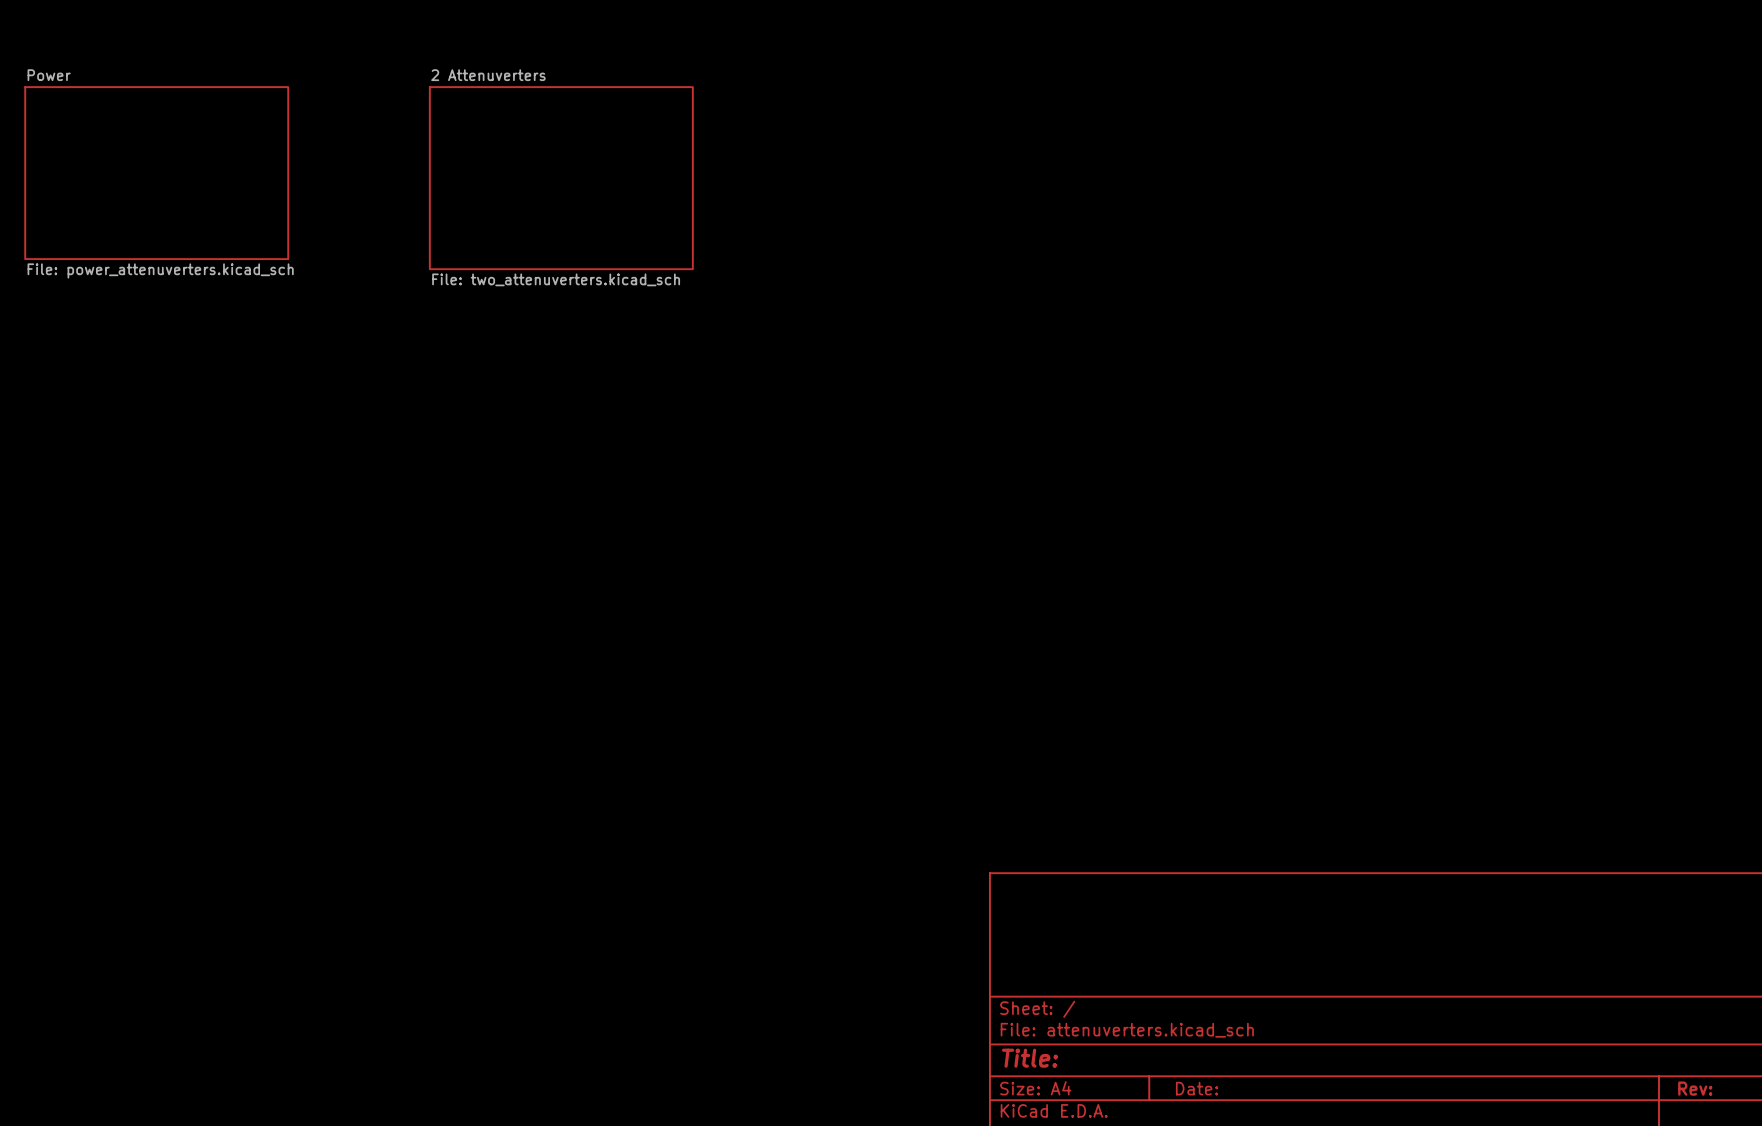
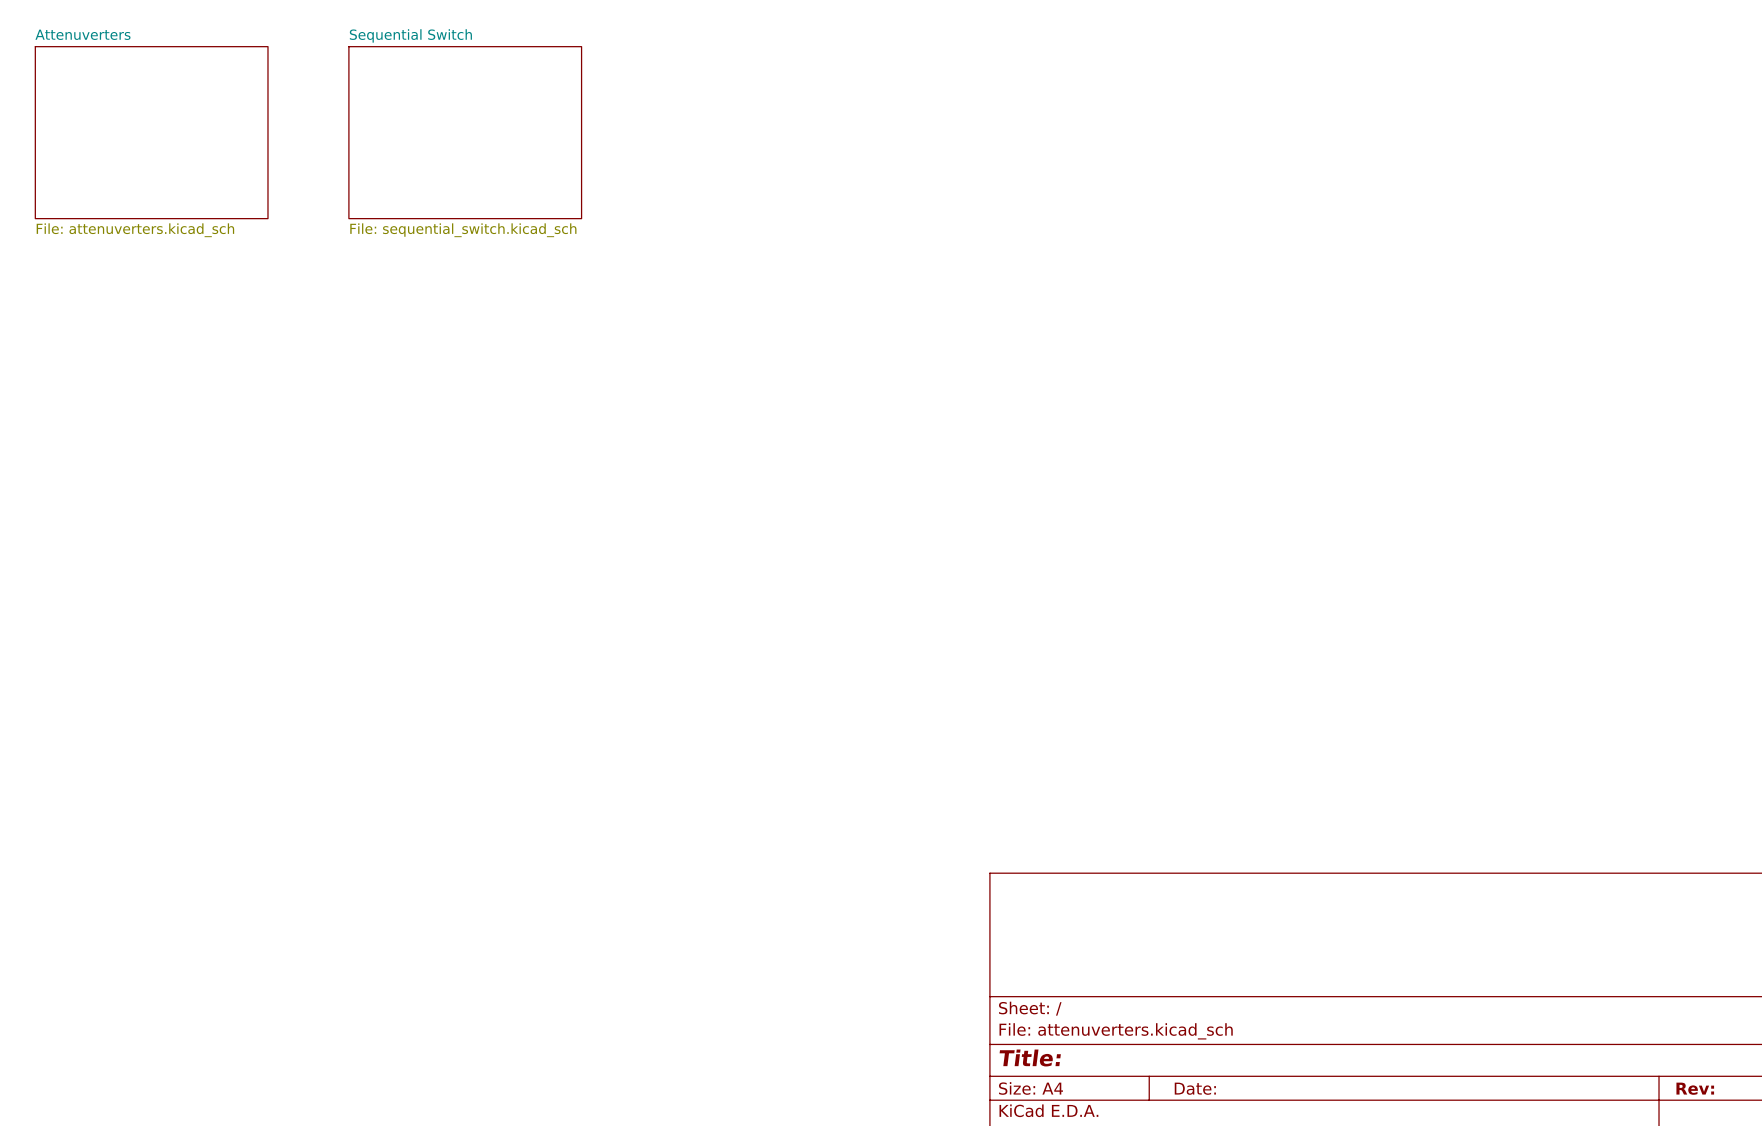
sheet Attenuverters: none -> File: attenuverters.kicad_sch (151, 132)
sheet Sequential Switch: none -> File: sequential_switch.kicad_sch (465, 132)
sheet Power: File: power_attenuverters.kicad_sch (156, 173) -> none
sheet 2 Attenuverters: File: two_attenuverters.kicad_sch (561, 178) -> none

